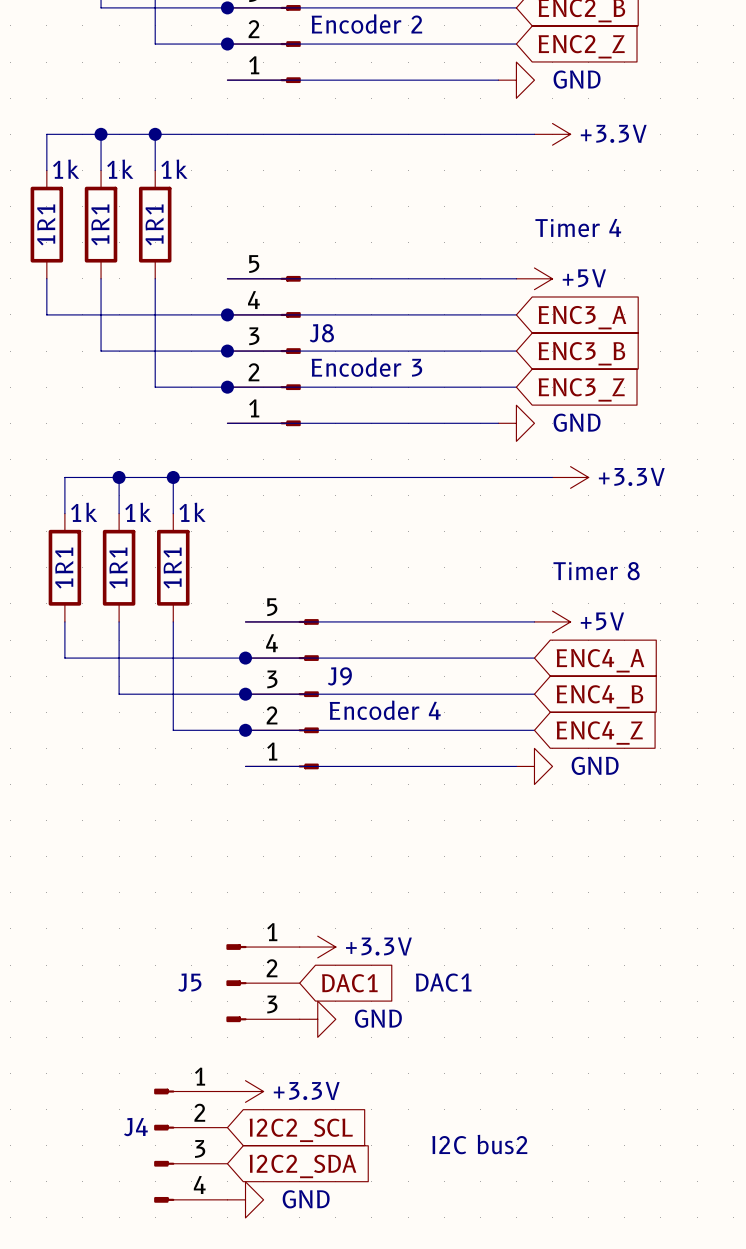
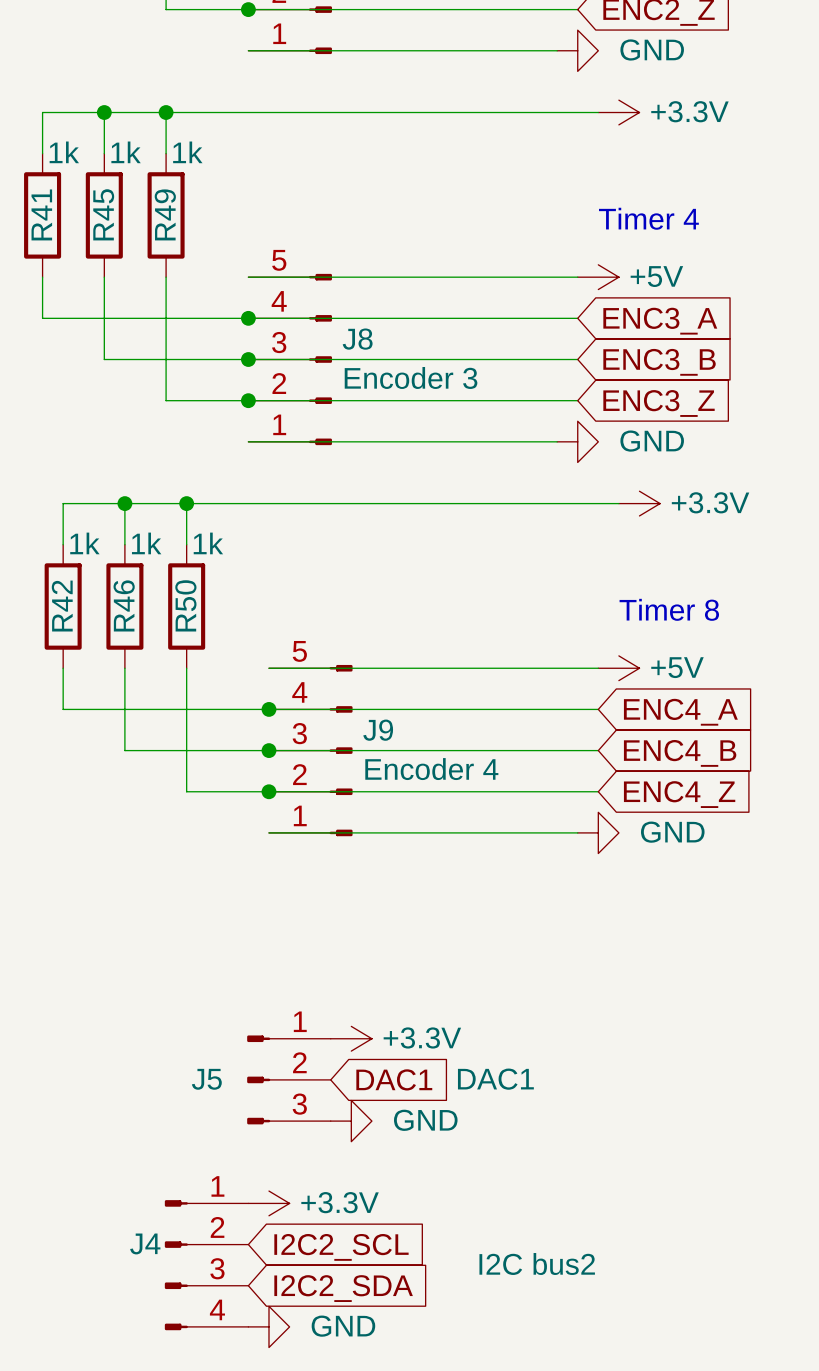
1R1 name: 1R1 (46, 224) -> R41 (41, 214)
1R1 name: 1R1 (100, 224) -> R45 (103, 214)
1R1 name: 1R1 (154, 224) -> R49 (165, 214)
1R1 name: 1R1 (64, 568) -> R42 (62, 606)
1R1 name: 1R1 (118, 568) -> R46 (124, 605)
1R1 name: 1R1 (172, 568) -> R50 (185, 605)

